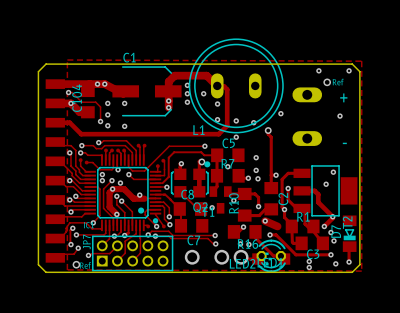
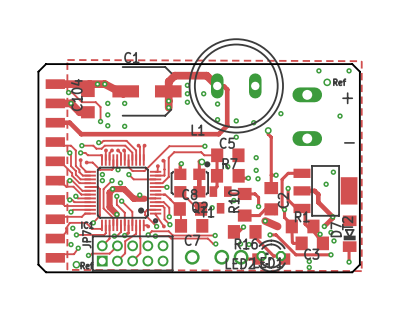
track: (72, 228) (70, 230) (70, 244) -> none
via position: (335, 263) -> (320, 234)

